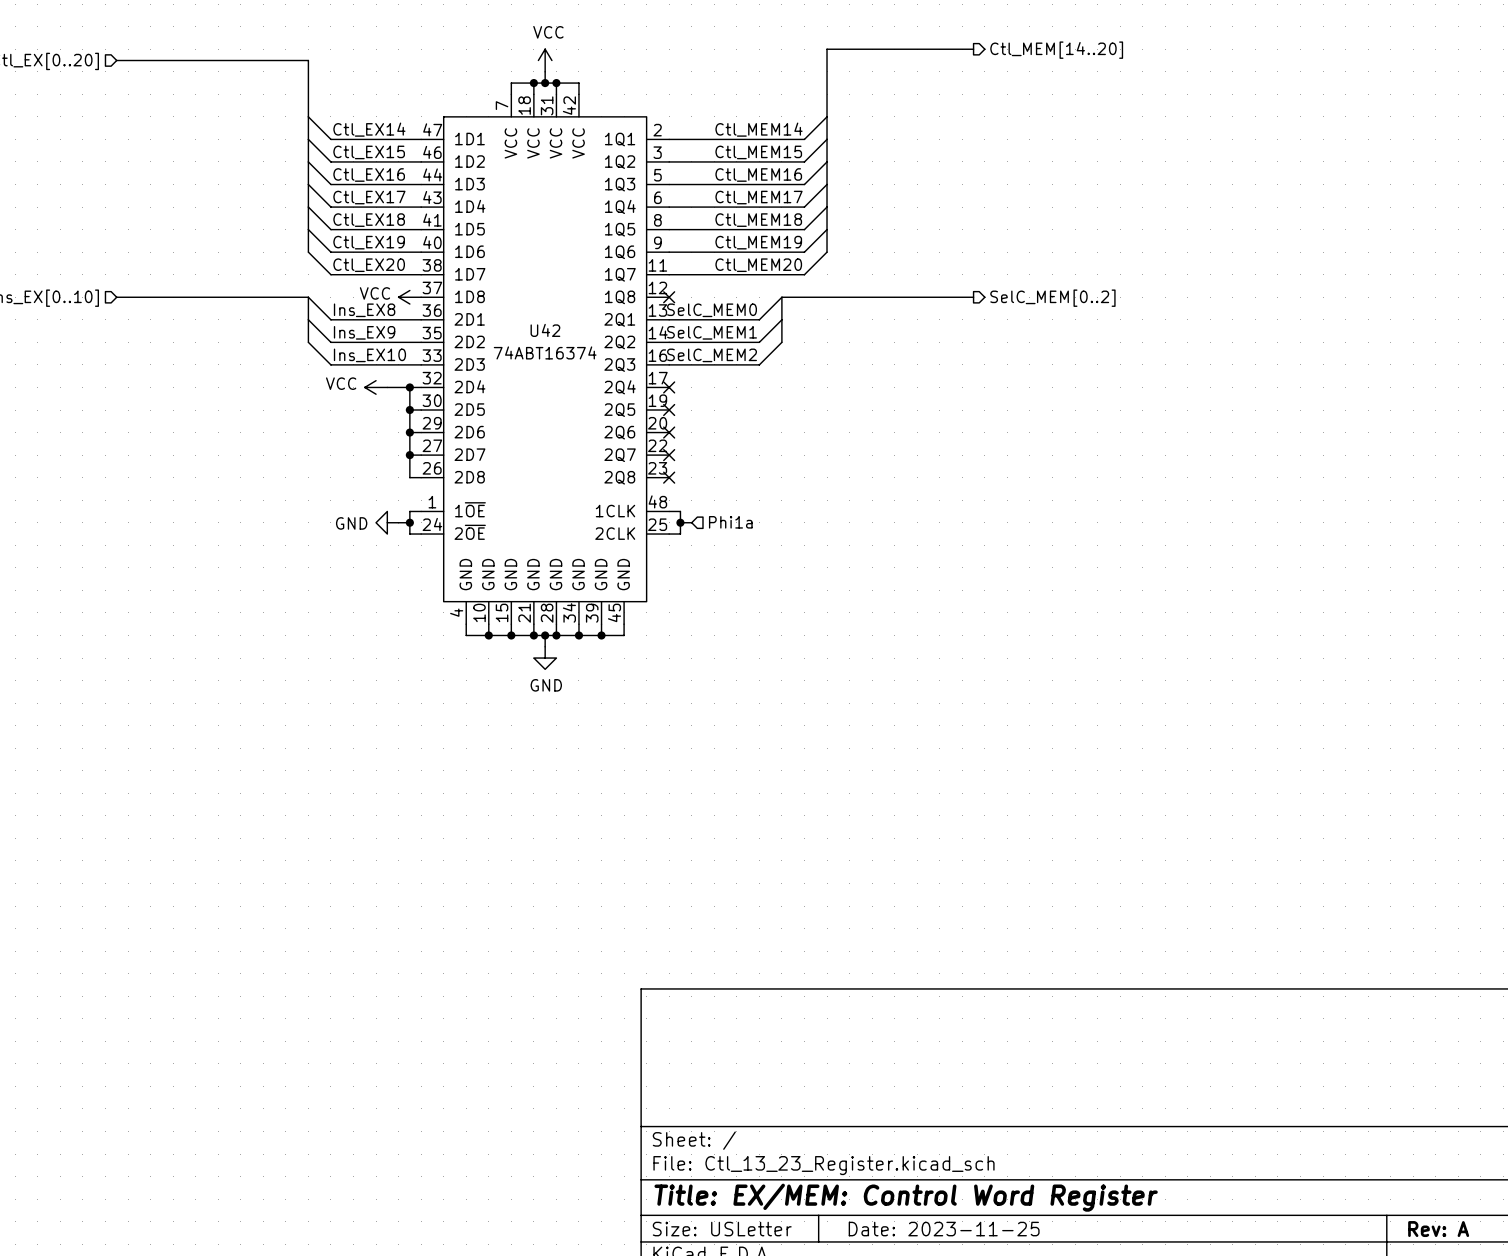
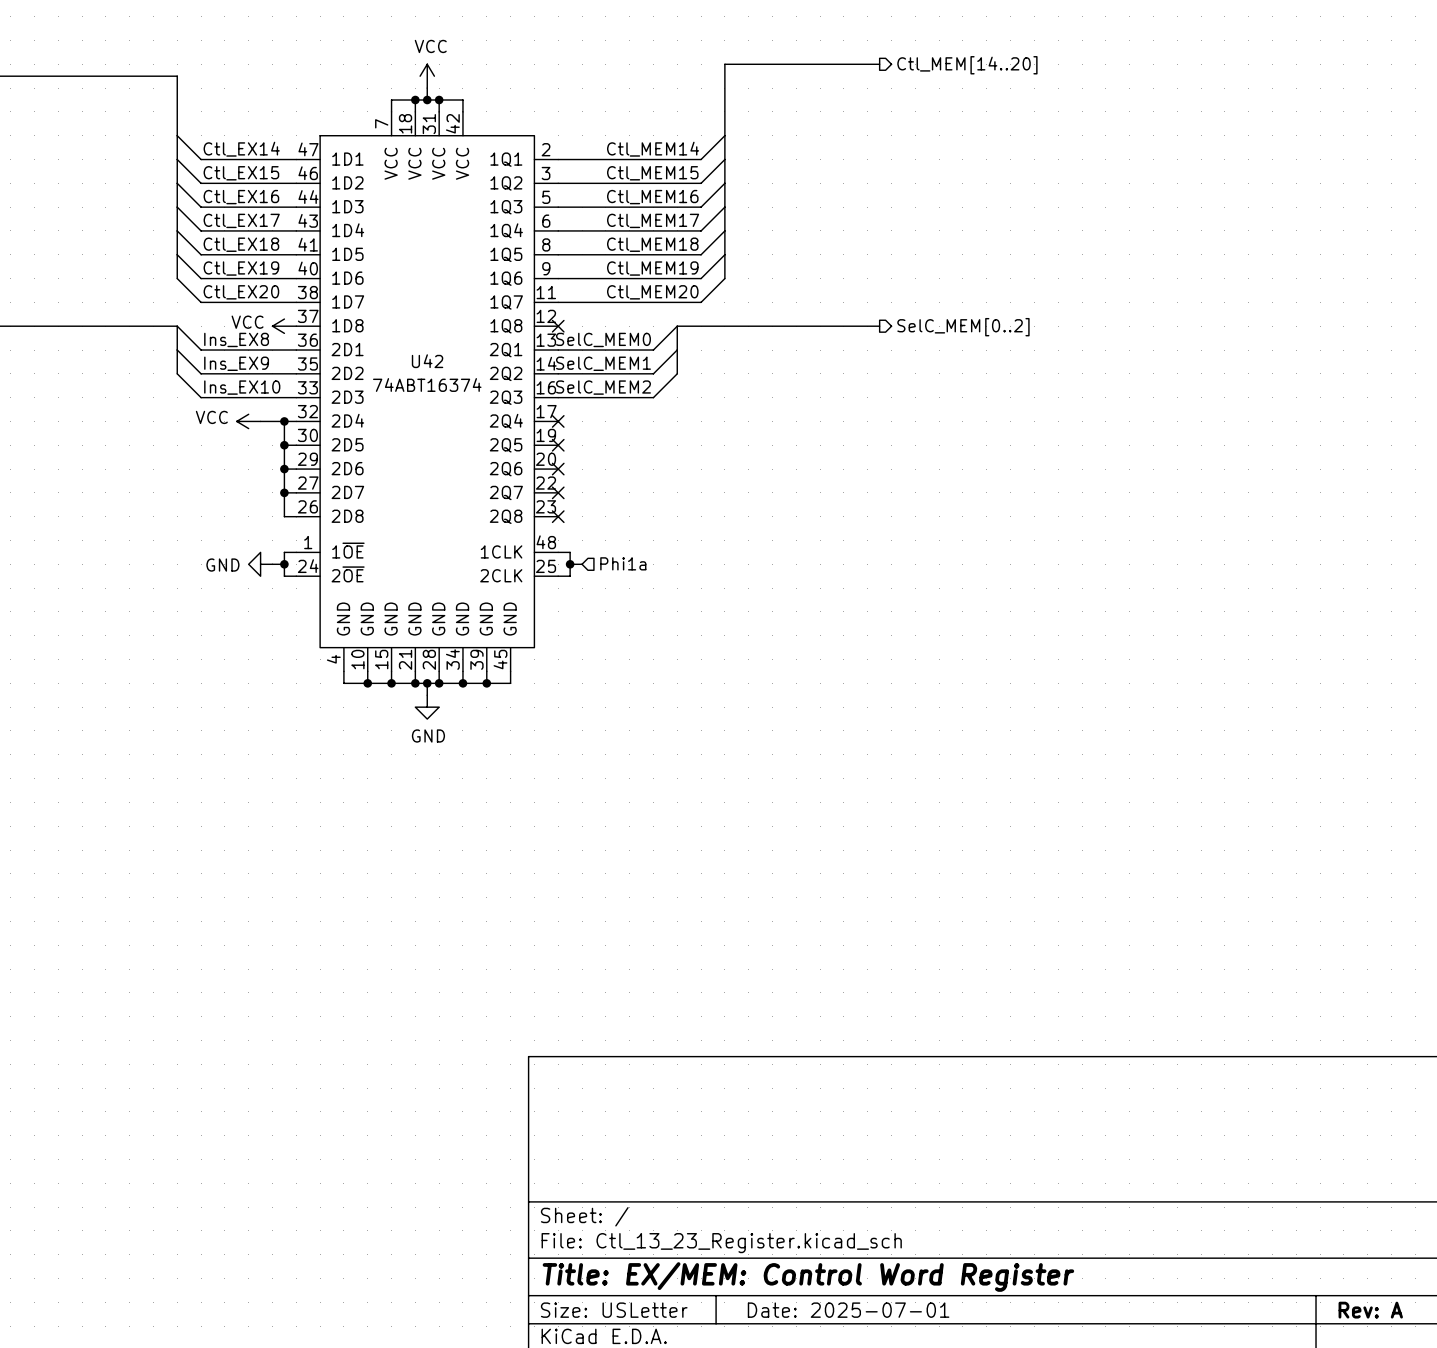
title block: Date: 2023-11-25 (944, 1229) -> Date: 2025-07-01 (848, 1310)

